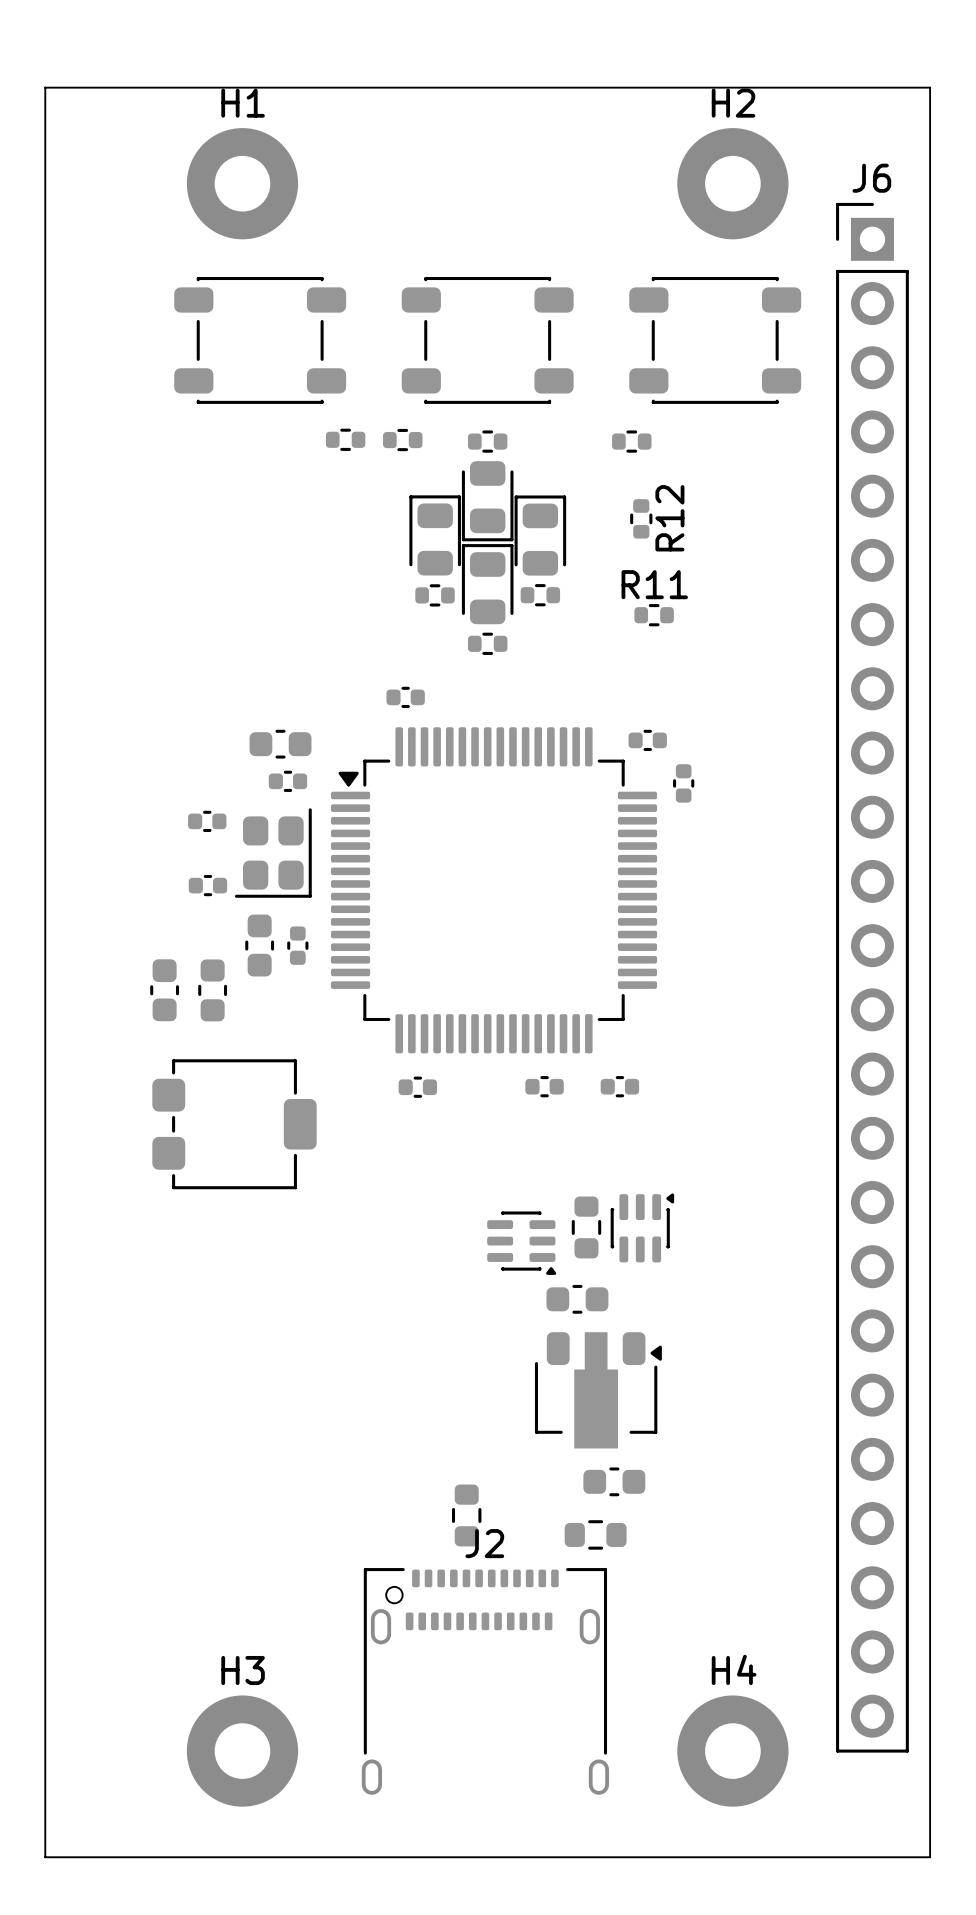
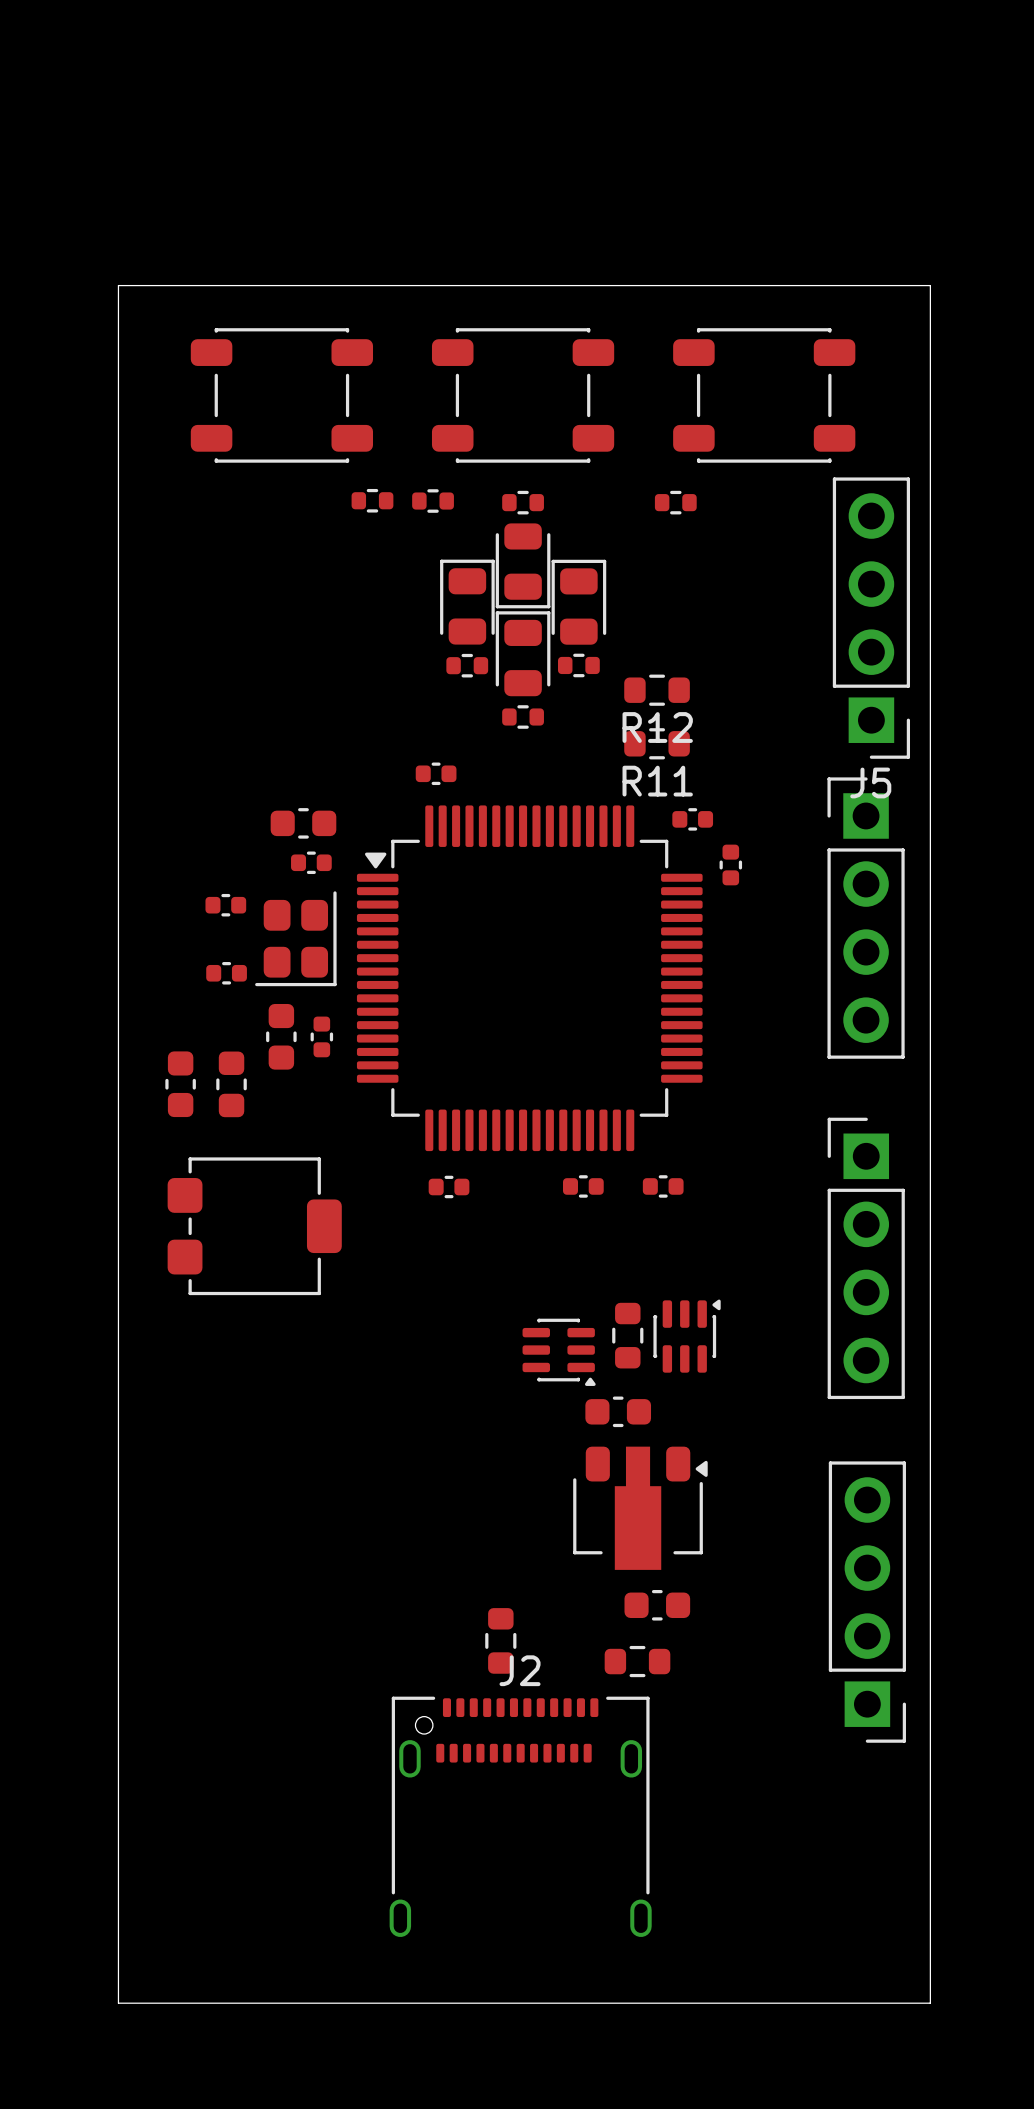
H1: (242, 183) -> none
H2: (732, 183) -> none
R12 footprint: [630, 499, 653, 539] -> [624, 674, 690, 706]
J5: none -> (871, 618)
R11 name position: R11 (654, 584) -> R11 (657, 781)
R11 footprint: [634, 604, 674, 627] -> [624, 728, 690, 760]
part: none -> (866, 918)
J6: (872, 977) -> none
part: none -> (866, 1258)
part: none -> (867, 1602)
H3: (242, 1751) -> none
H4: (732, 1751) -> none
board edge: (105, 1857) (45, 1857) (45, 87) (930, 87) (930, 1857) (871, 1857) -> (118, 2003) (118, 285) (930, 285) (930, 2003)

